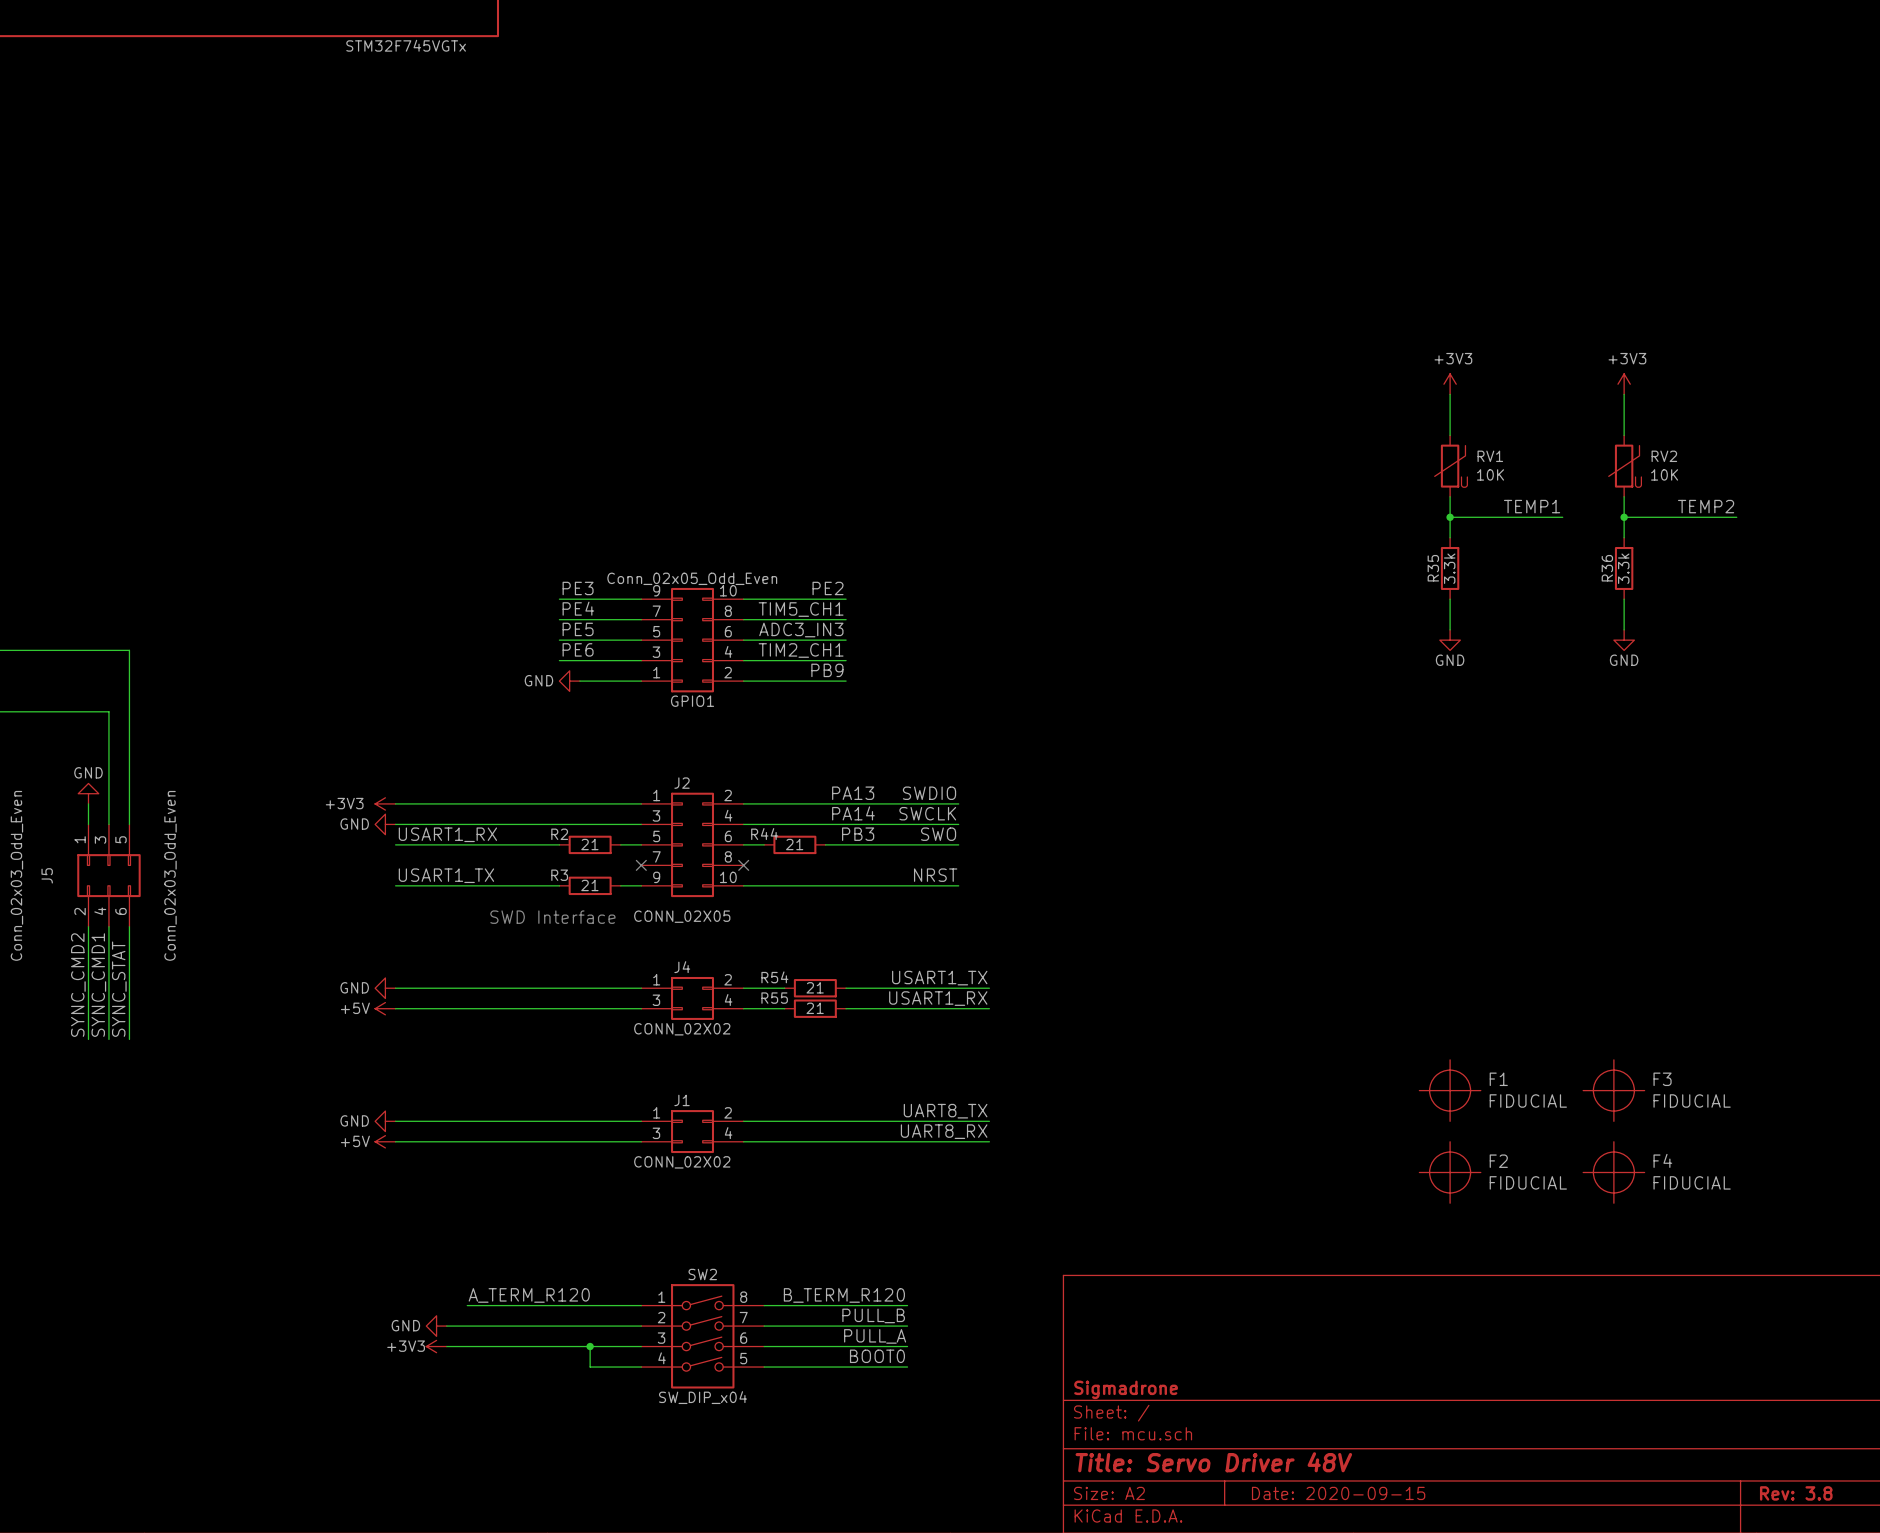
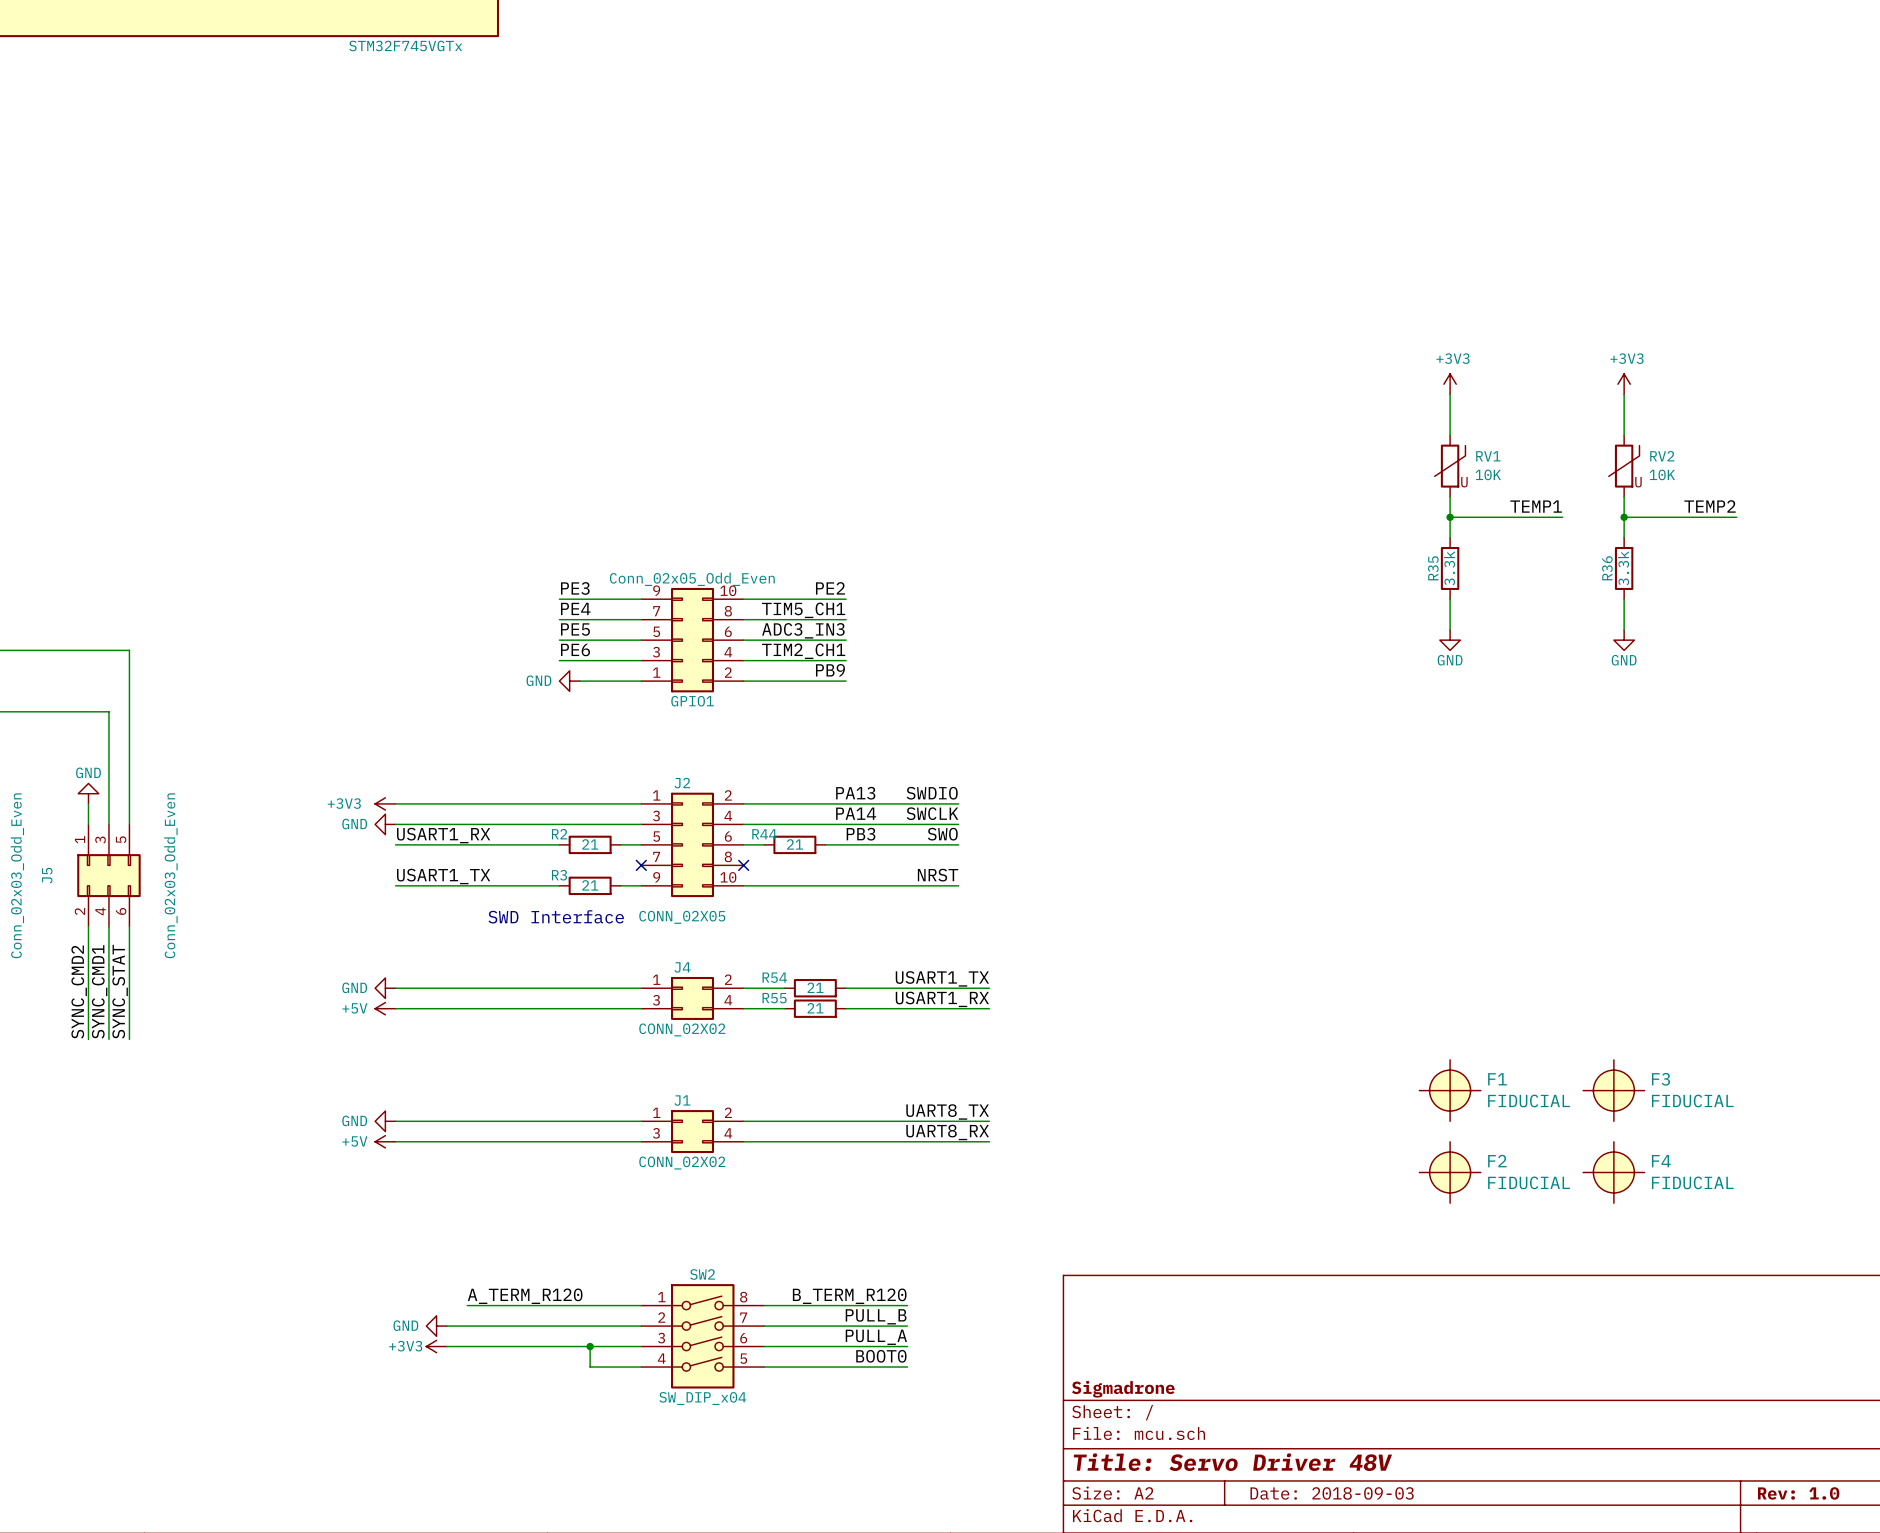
title block: Date: 2020-09-15 (1338, 1493) -> Date: 2018-09-03 (1332, 1493)
title block: Rev: 3.8 (1796, 1493) -> Rev: 1.0 (1798, 1493)

